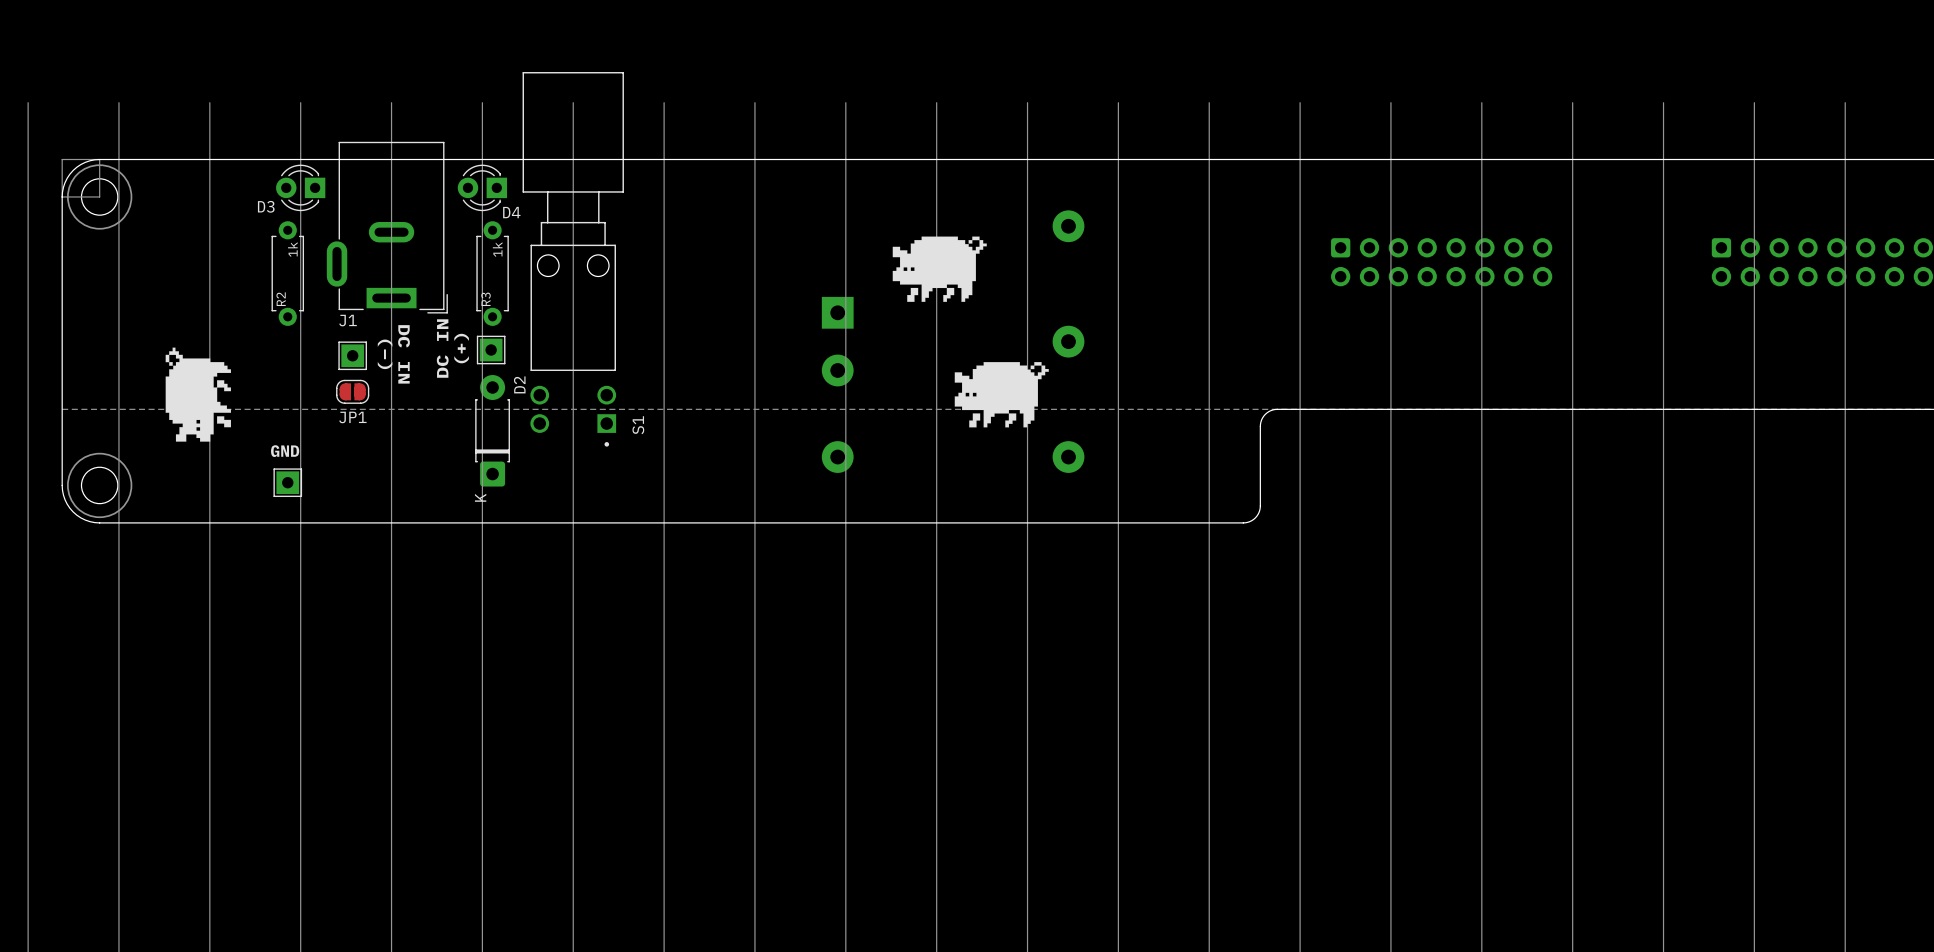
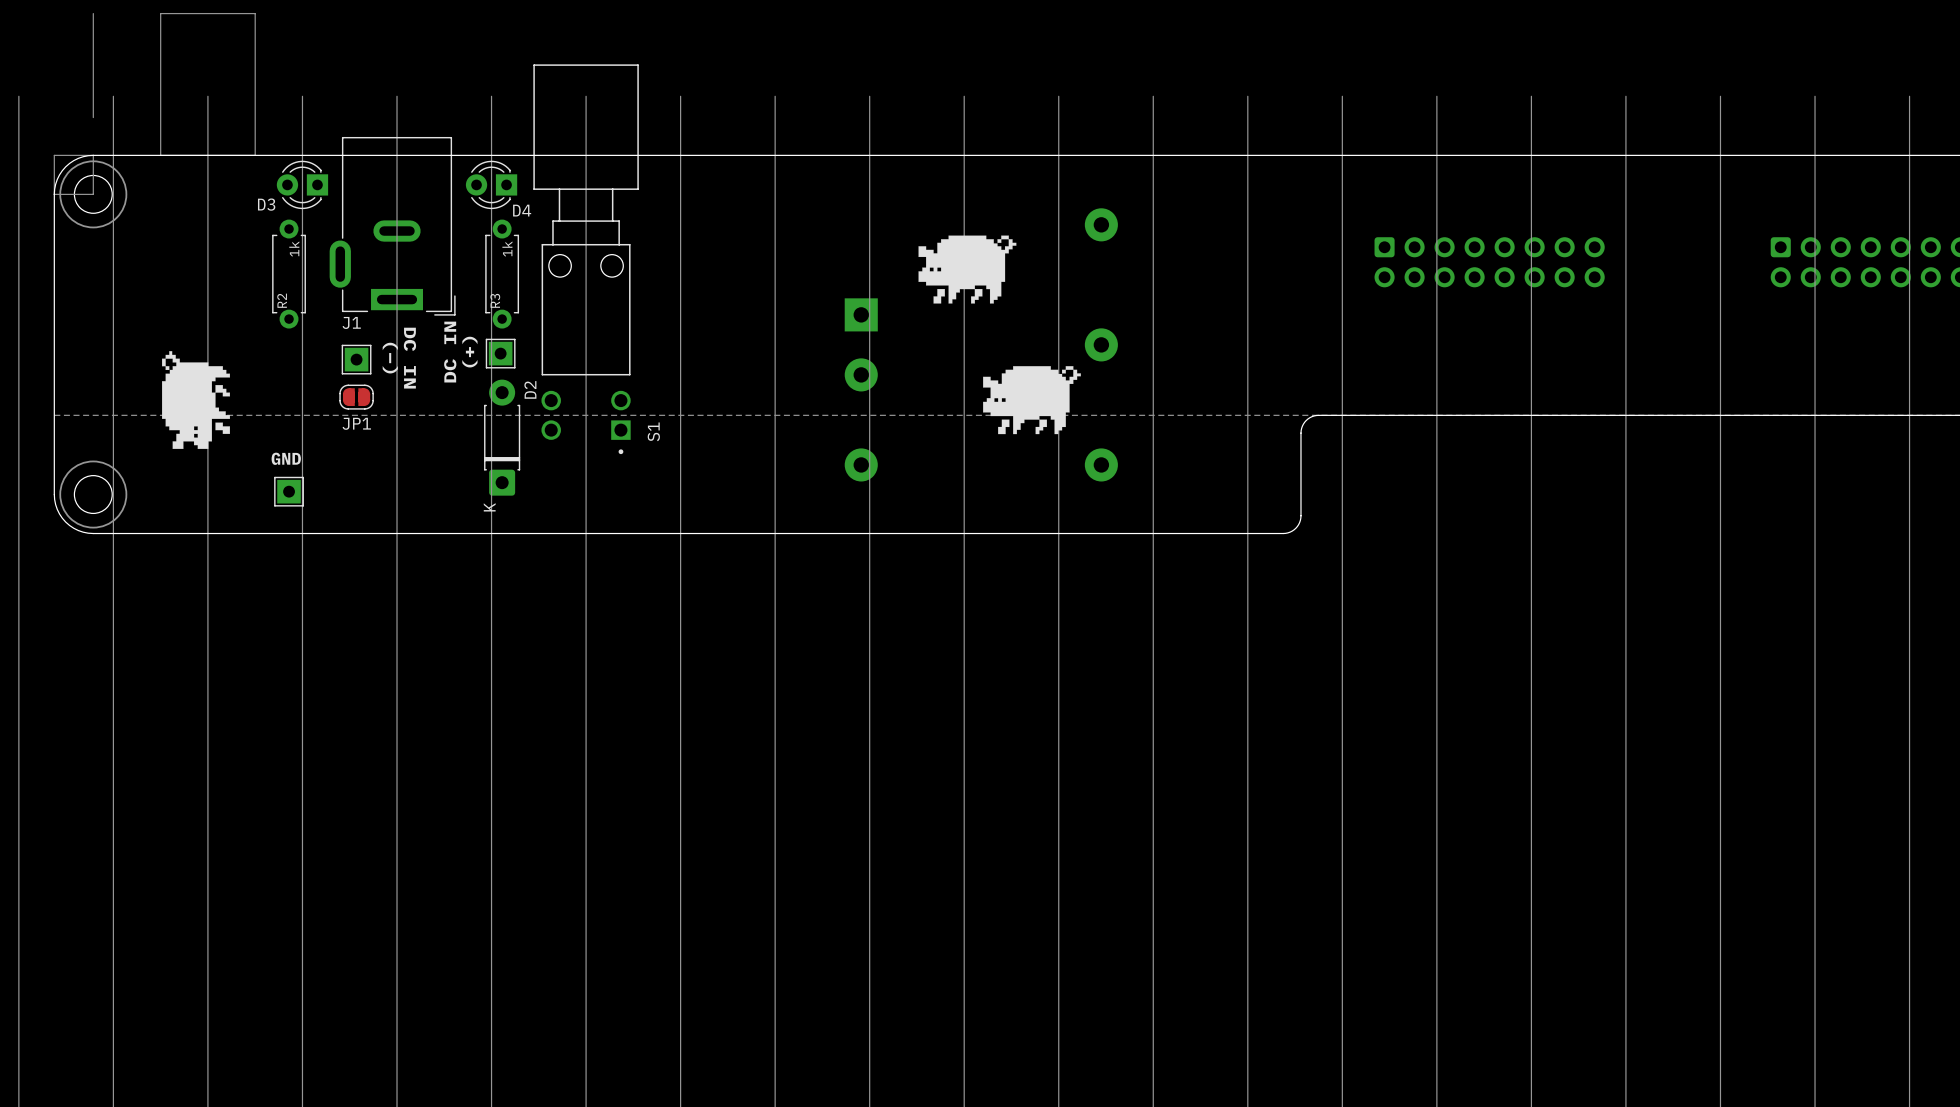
line: none -> (93, 13) (93, 117)
line: none -> (160, 13) (255, 13) (255, 155) (160, 155) (160, 13)

